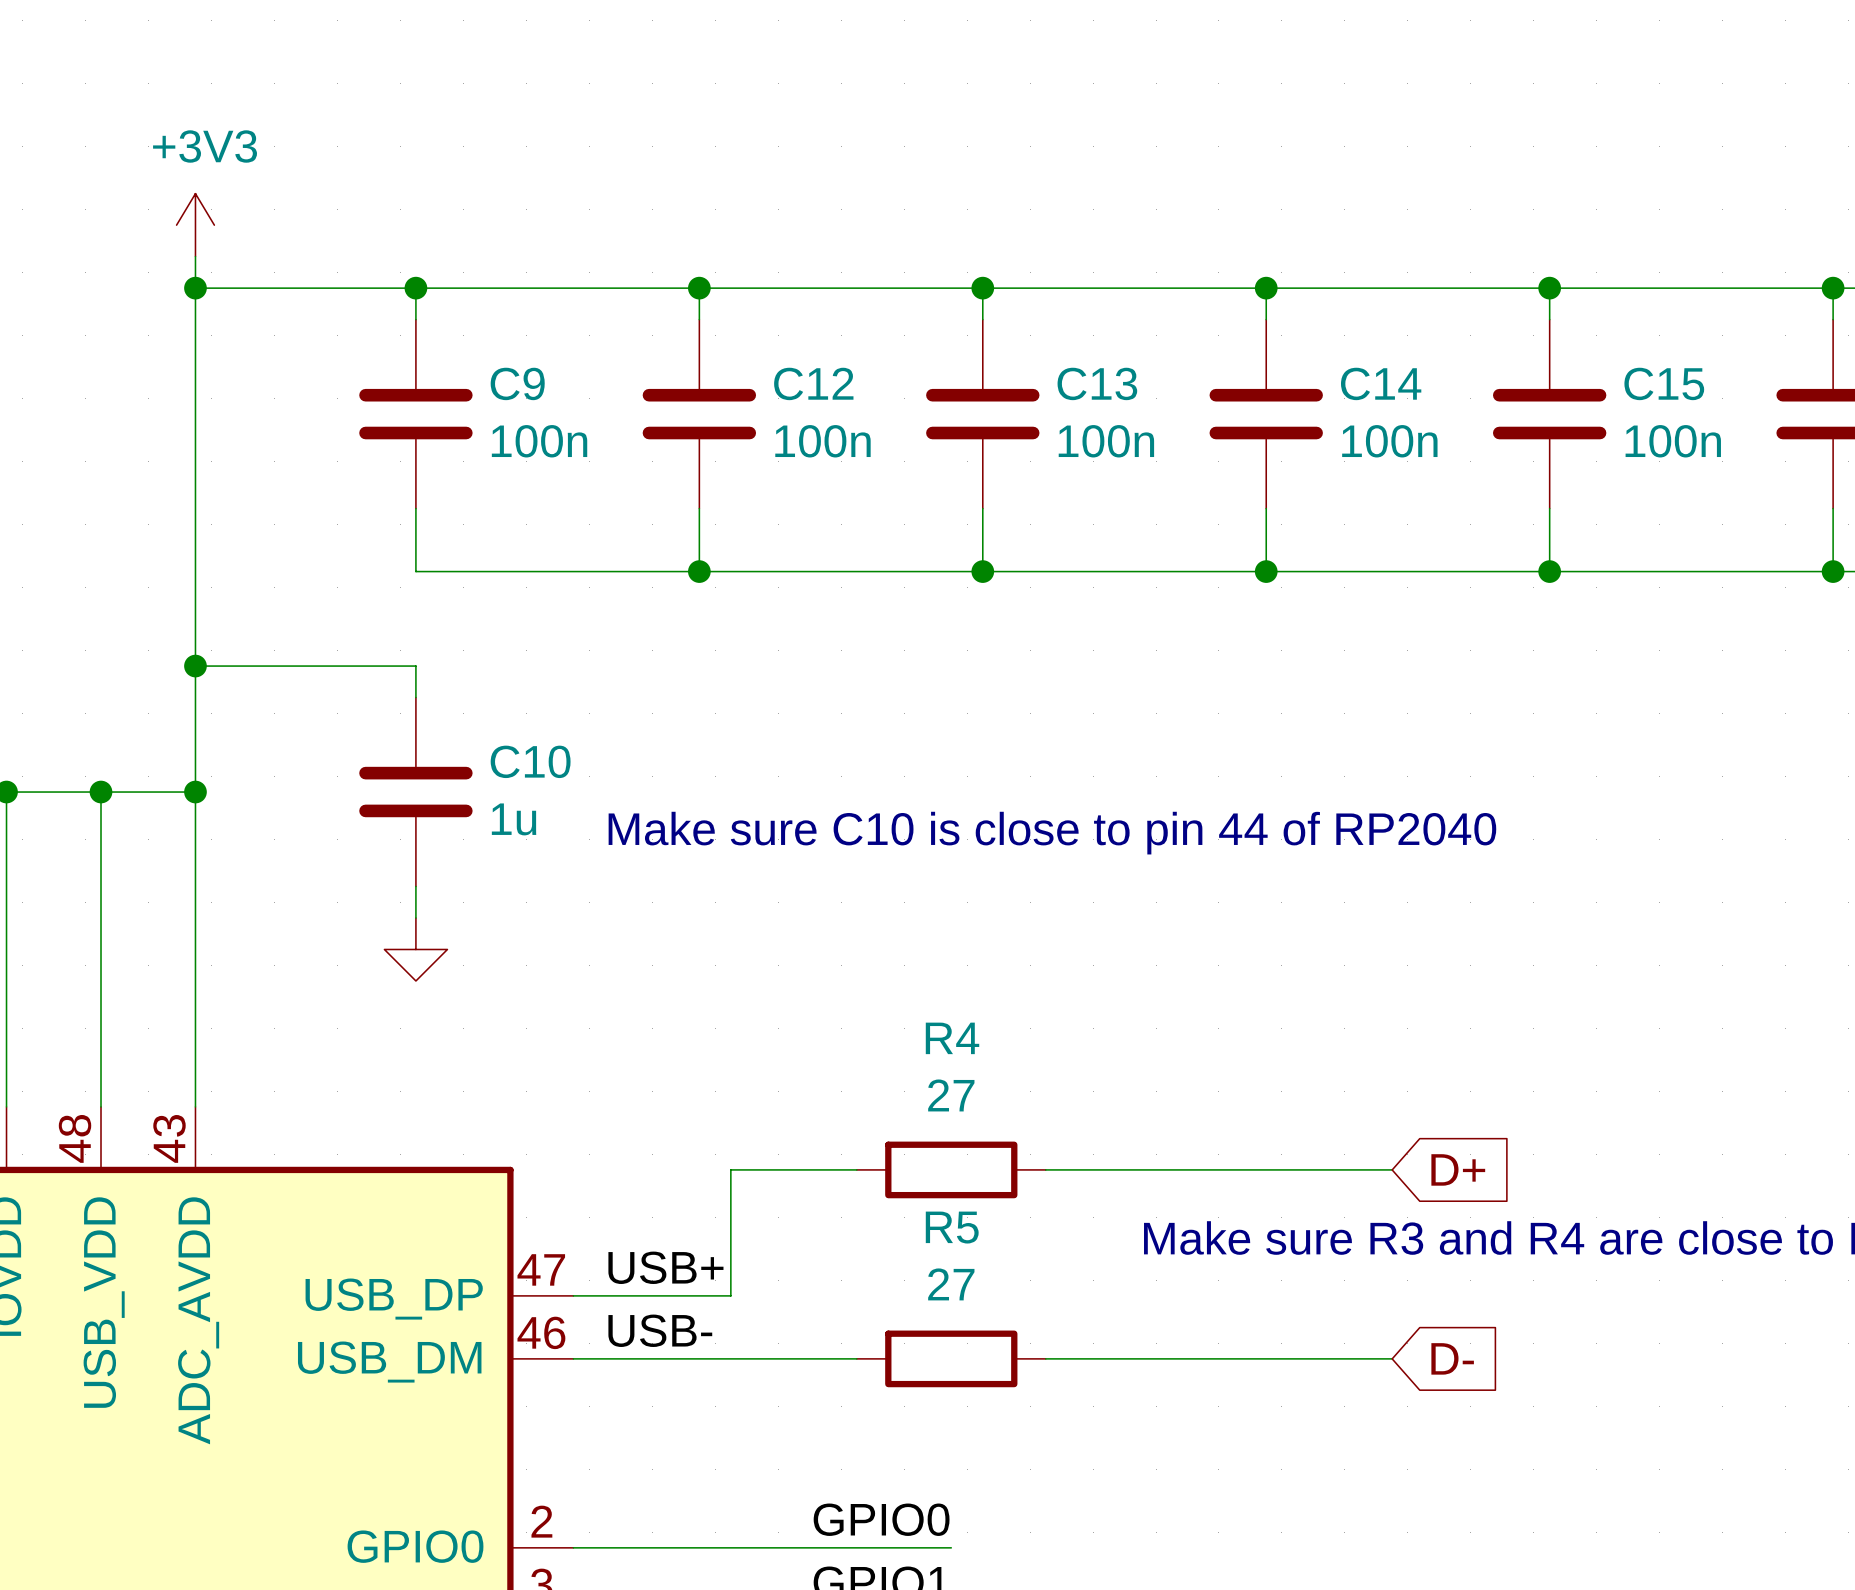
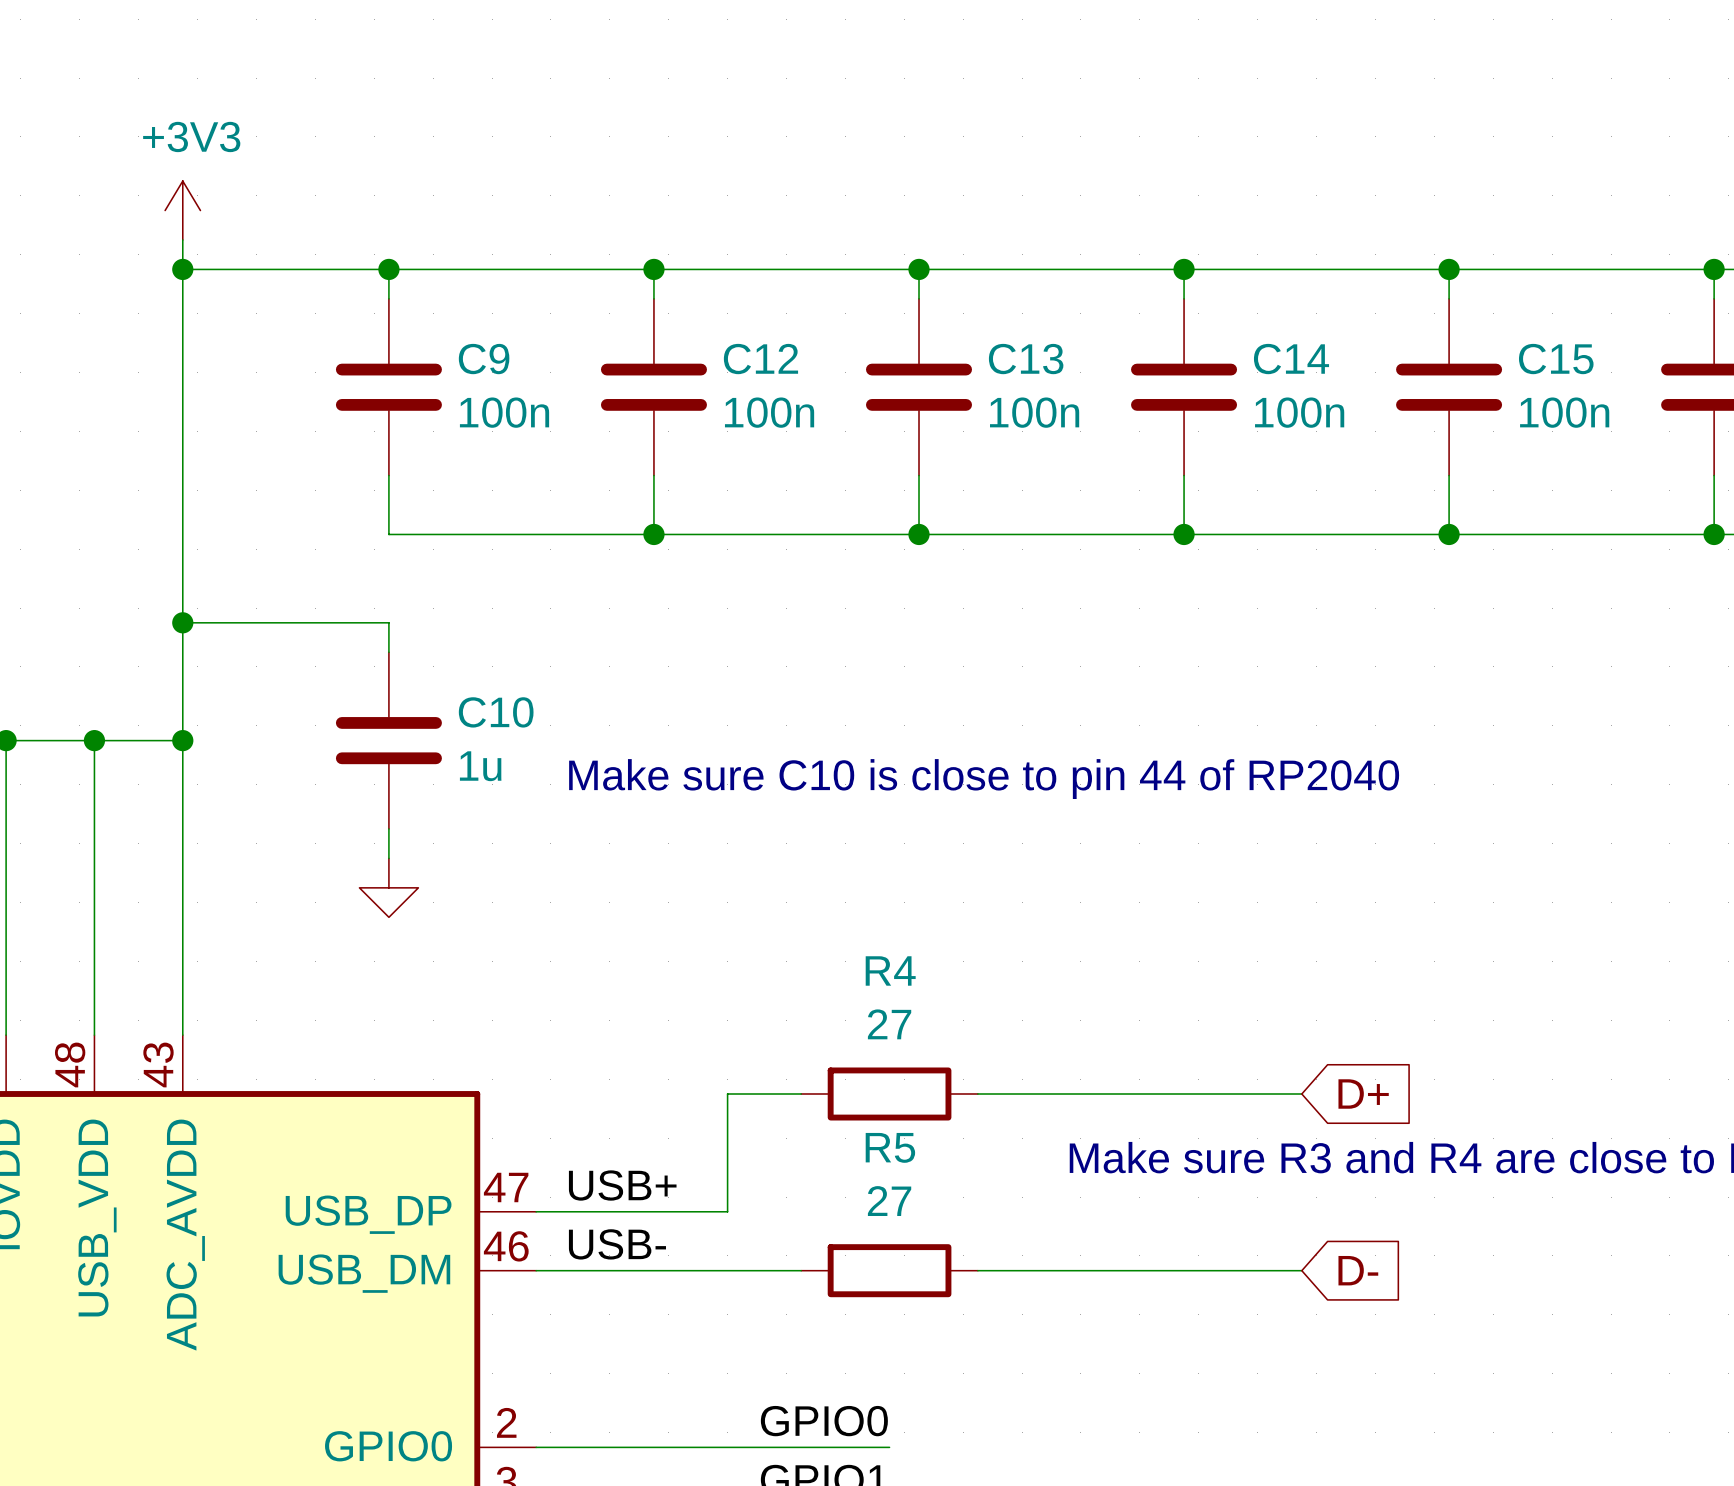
wire: (778, 1169) (730, 1169) (730, 1295) -> (727, 1094) (727, 1211) (683, 1211)

